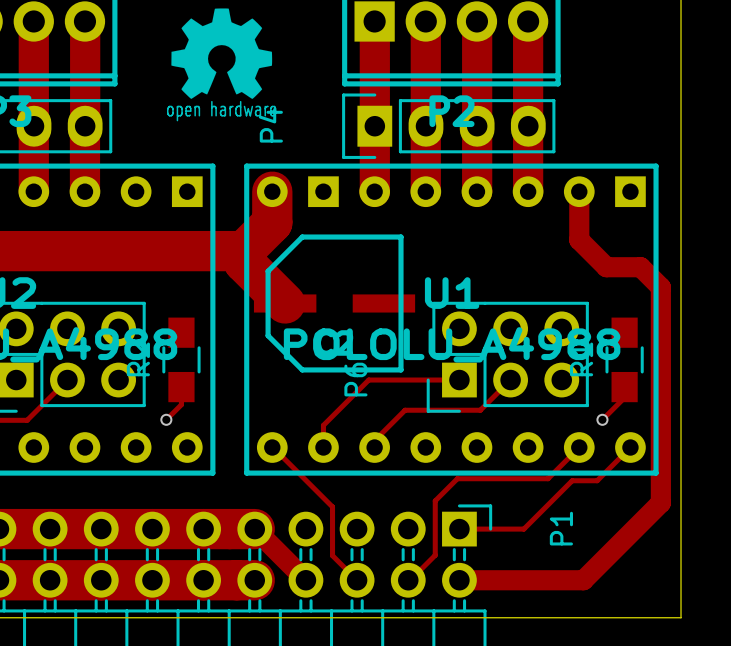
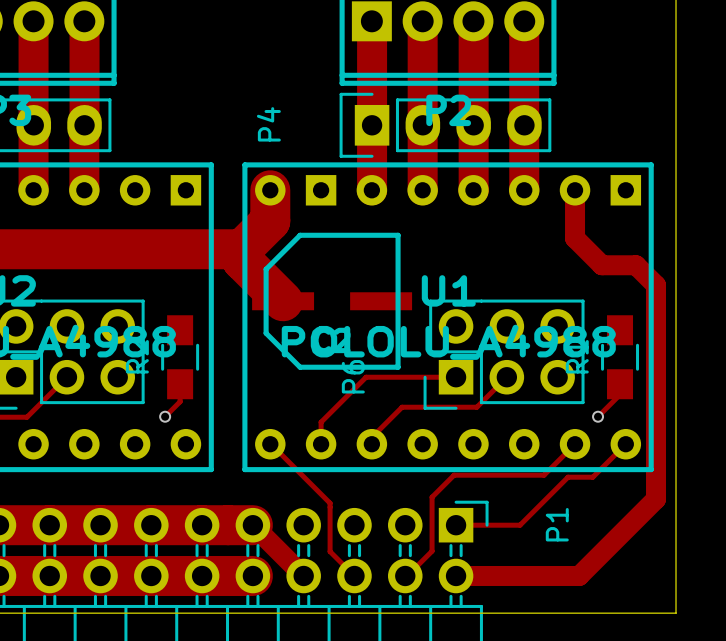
drawing: [167, 8, 277, 122] -> none

